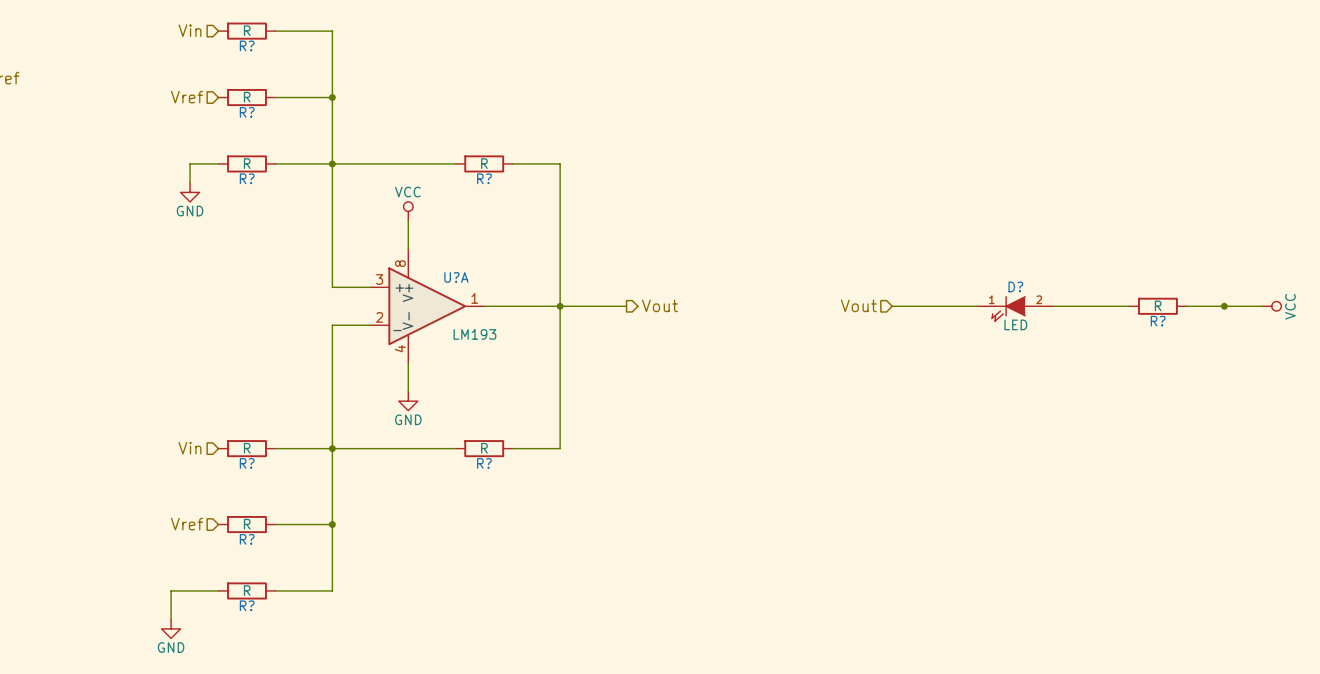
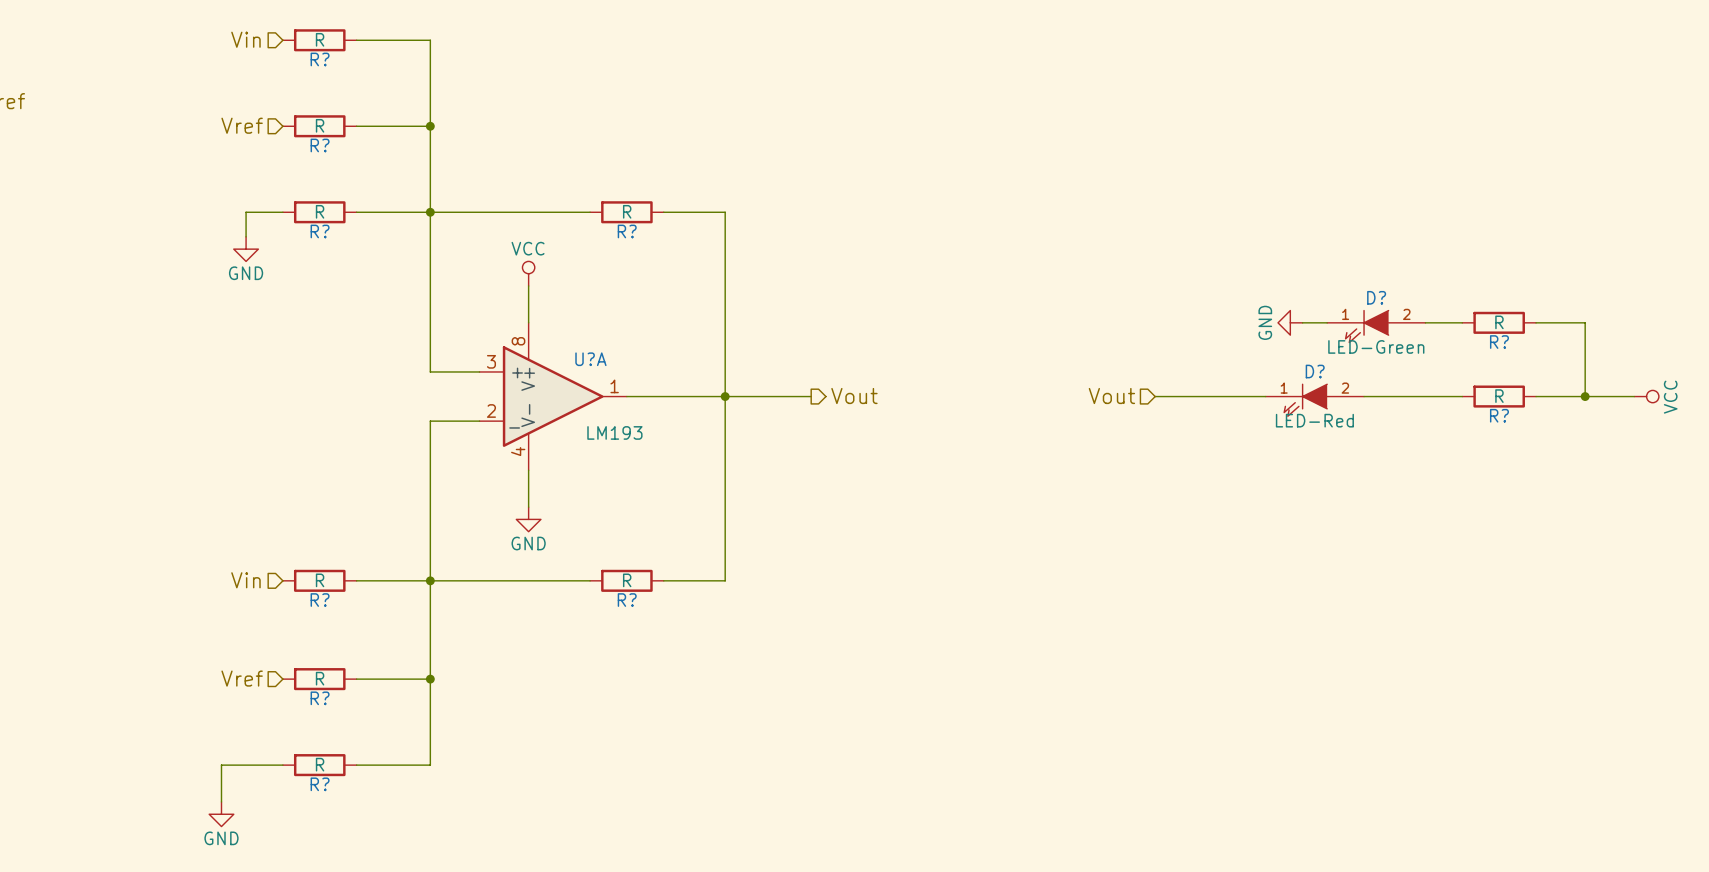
power symbol: none -> GND (1290, 322)
wire: none -> (1302, 322) (1327, 322)
wire: none -> (1425, 322) (1462, 322)
R?: none -> R (1499, 322)
wire: none -> (1536, 322) (1585, 322) (1585, 396)
D?: none -> LED-Green (1376, 326)
D? value: LED (1015, 324) -> LED-Red (1314, 420)

